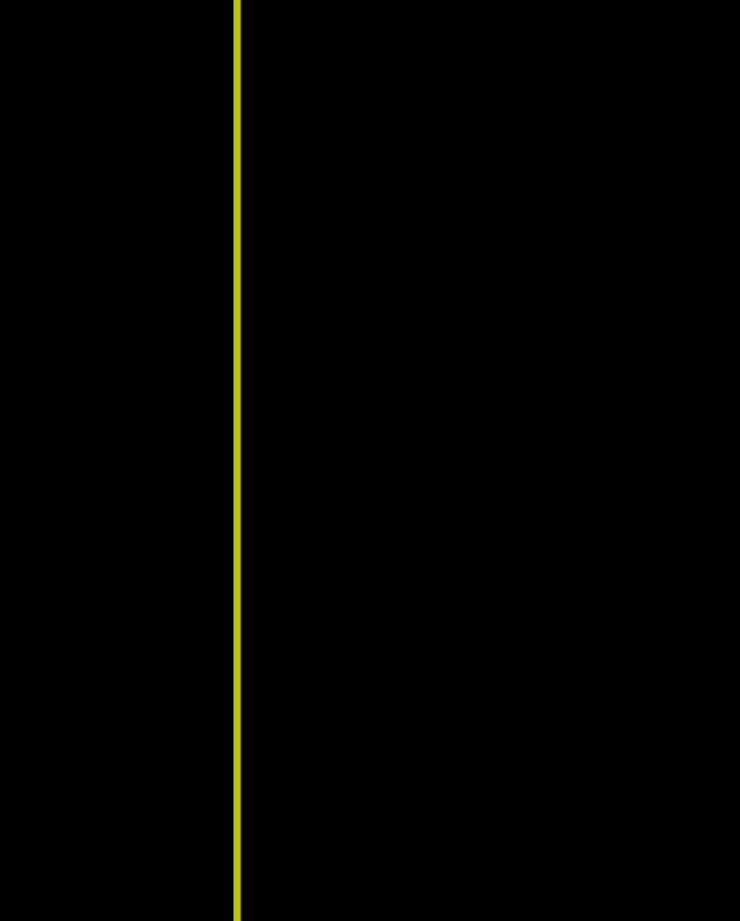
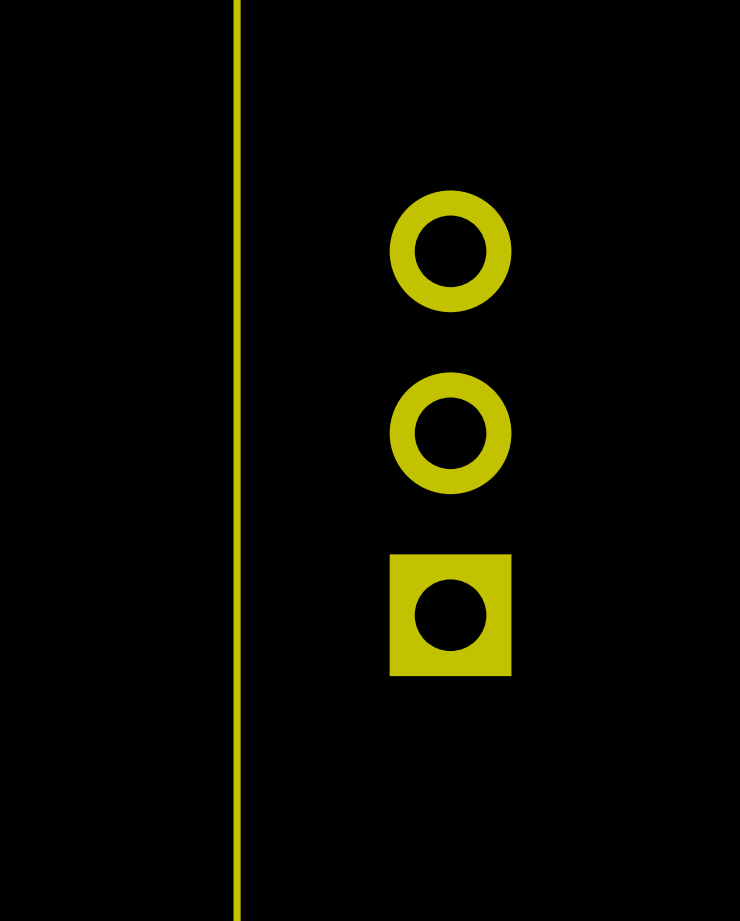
part: none -> (450, 433)

